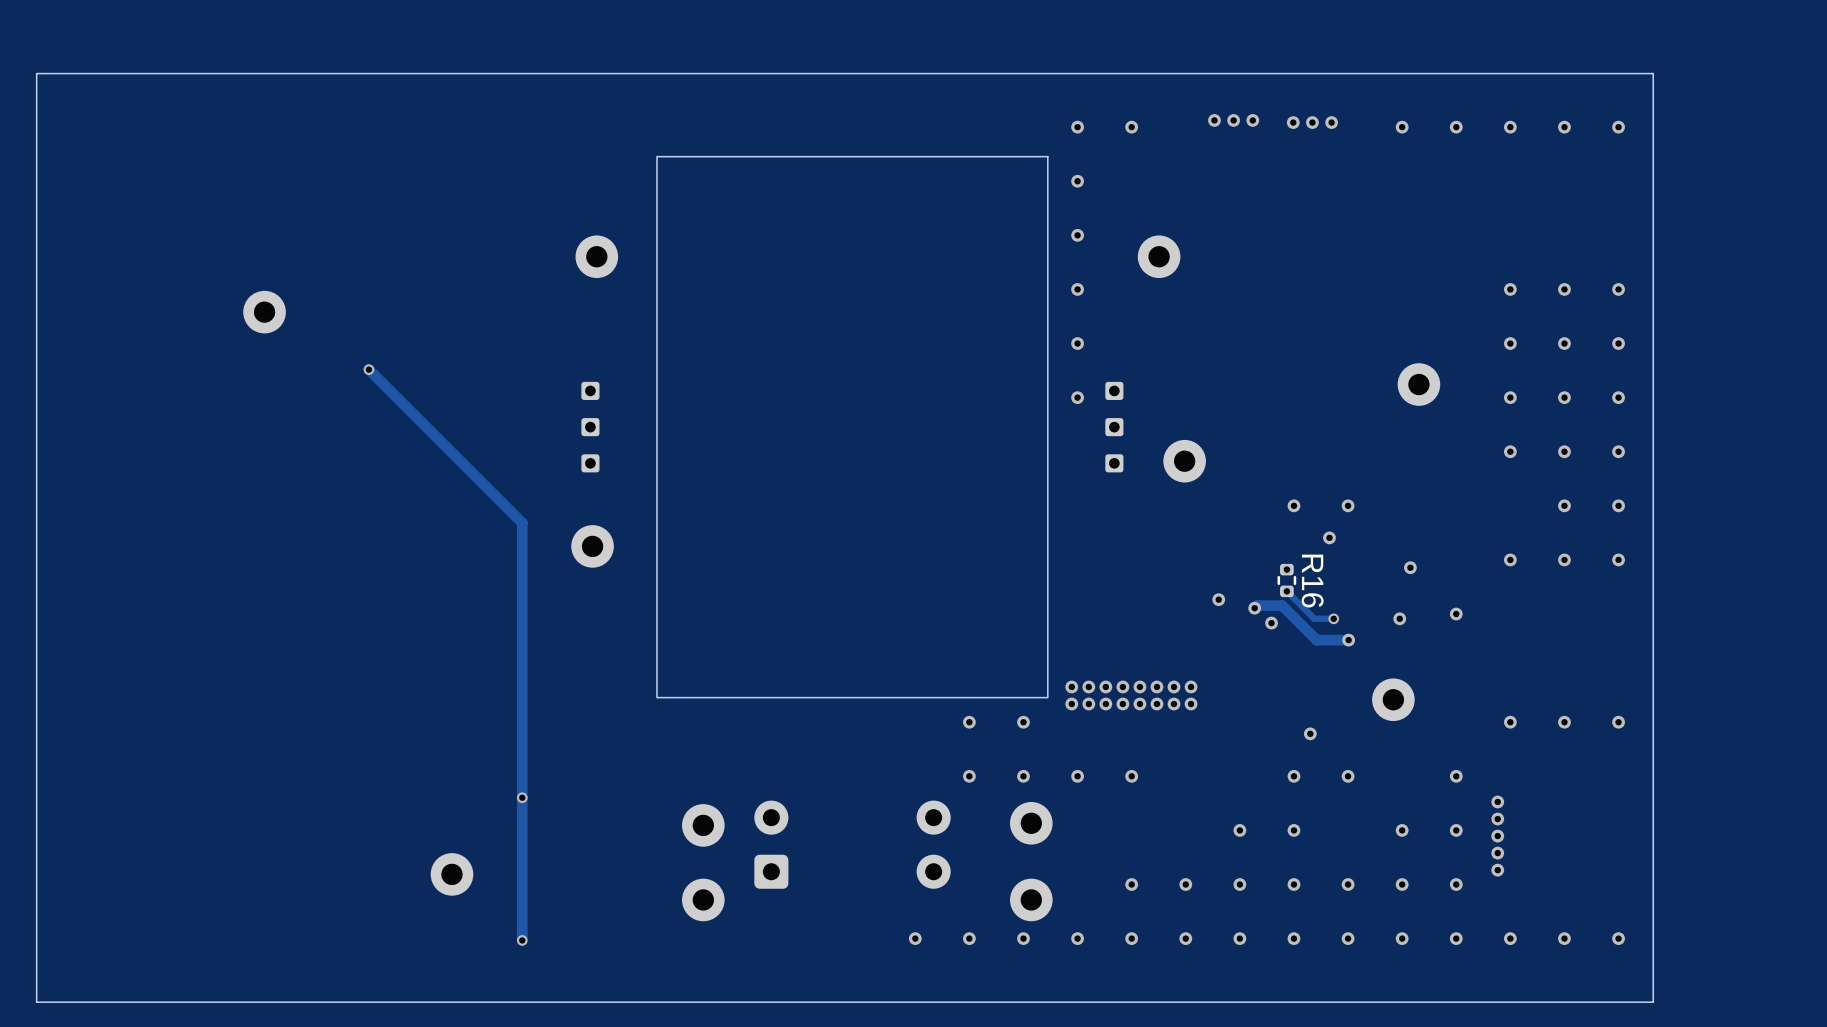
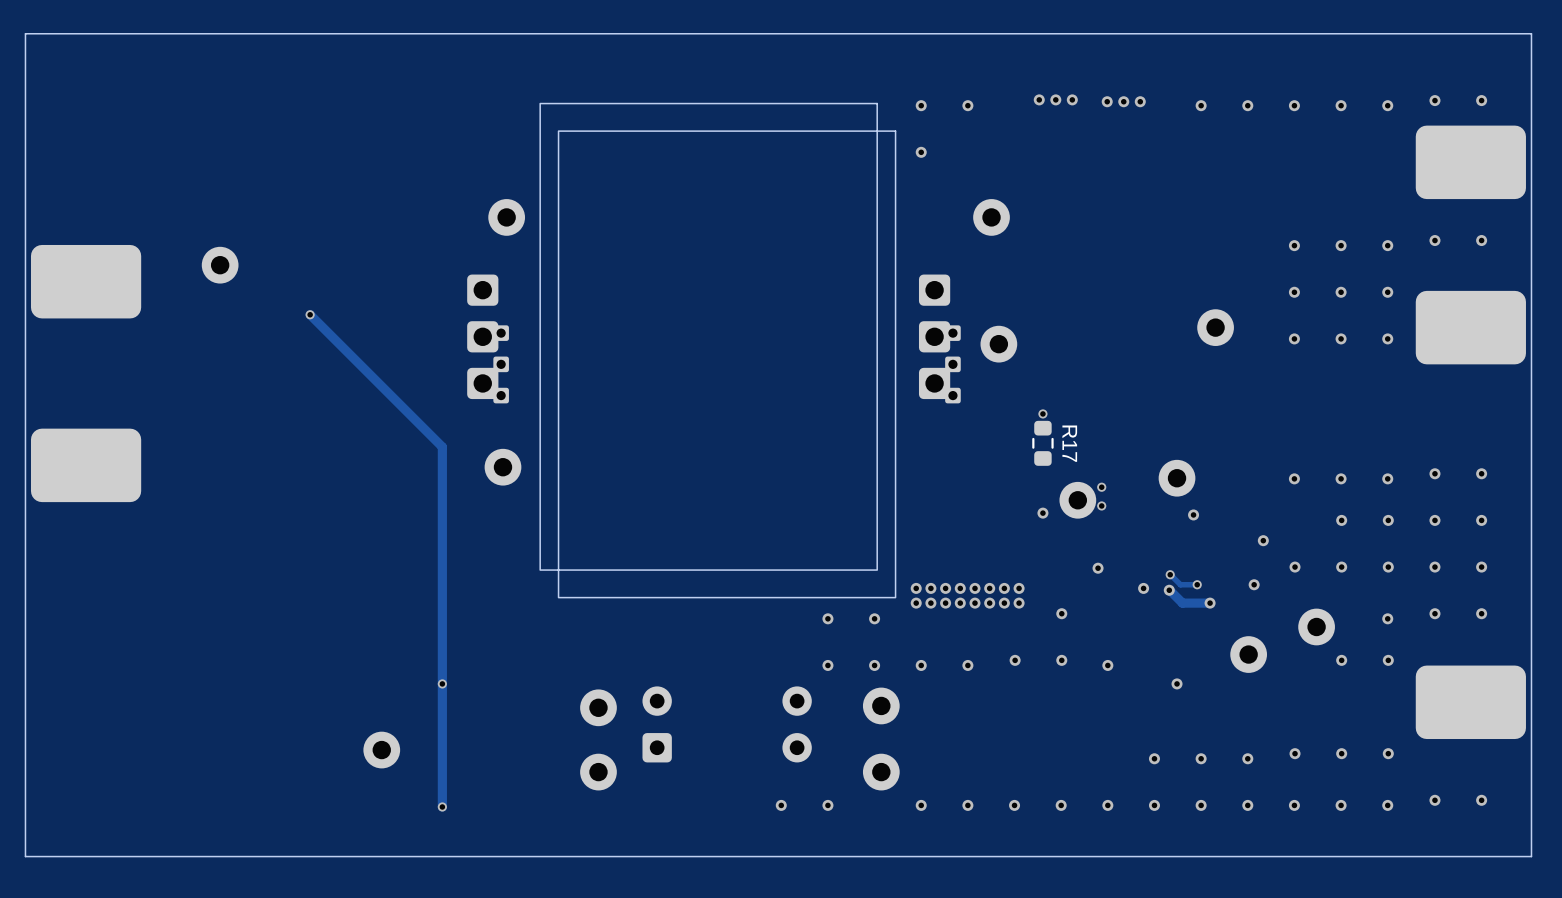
board edge: (1653, 73) (36, 73) (36, 1002) (1653, 1002) (1653, 73) -> (1531, 33) (1531, 856) (25, 856) (25, 33) (1531, 33)
via: none -> (1434, 100)
via: none -> (1481, 100)
part: none -> (1470, 162)
via: (1077, 235) -> none
via: none -> (1434, 240)
via: none -> (1481, 240)
via: (1077, 289) -> none
part: none -> (86, 281)
via: (1077, 343) -> none
part: none -> (1470, 327)
part: none -> (708, 336)
via: (1077, 397) -> none
via: (1510, 451) -> none
via: (1564, 451) -> none
via: (1618, 451) -> none
part position: (1184, 461) -> (998, 344)
via: none -> (1042, 413)
via: (1293, 505) -> none
via: (1348, 505) -> none
via: (1564, 505) -> none
via: (1618, 505) -> none
R17: none -> (1042, 443)
via: (1329, 537) -> none
part: none -> (86, 465)
via: none -> (1434, 473)
via: none -> (1481, 473)
part: none -> (1177, 478)
via: (1410, 567) -> none
R16: (1286, 580) -> none
part: none -> (1077, 500)
track: (1286, 591) (1314, 618) (1333, 618) -> none
track: (1254, 608) (1257, 605) (1282, 605) (1316, 640) (1348, 640) -> none
via: (1254, 608) -> none
via: none -> (1341, 520)
via: none -> (1388, 520)
via: none -> (1434, 520)
via: none -> (1481, 520)
via position: (1456, 614) -> (1263, 540)
via: (1333, 618) -> none
via position: (1399, 618) -> (1193, 514)
via: (1271, 623) -> none
via: (1348, 640) -> none
via: none -> (1295, 567)
via: none -> (1341, 567)
via: none -> (1388, 567)
via: none -> (1434, 567)
via: none -> (1481, 567)
via: none -> (1098, 568)
track: none -> (1170, 574) (1180, 584) (1197, 584)
via: none -> (1170, 574)
via: none -> (1197, 584)
via: none -> (1254, 584)
via: none -> (1143, 588)
track: none -> (1169, 590) (1182, 603) (1210, 603)
via: none -> (1169, 590)
part: (1393, 699) -> none
via: none -> (1210, 603)
via: none -> (1061, 613)
via: none -> (1434, 613)
via: none -> (1481, 613)
via: (1510, 722) -> none
via: (1564, 722) -> none
part: none -> (1316, 626)
via: (1310, 733) -> none
part: none -> (1248, 654)
via: none -> (1015, 660)
via: none -> (1061, 660)
via: none -> (1341, 660)
via: none -> (1388, 660)
via: (1348, 776) -> none
via: (1456, 776) -> none
via: none -> (1177, 683)
via: (1497, 801) -> none
via: (1497, 819) -> none
part: none -> (1470, 702)
via: (1239, 830) -> none
via: (1293, 830) -> none
via: (1402, 830) -> none
via: (1456, 830) -> none
via: (1497, 836) -> none
via: (1497, 853) -> none
via: (1497, 870) -> none
via: none -> (1295, 753)
via: none -> (1341, 753)
via: none -> (1388, 753)
via: (1131, 884) -> none
via: (1185, 884) -> none
via: (1239, 884) -> none
via: (1293, 884) -> none
via: none -> (1434, 800)
via: none -> (1481, 800)
via: (1023, 938) -> none

